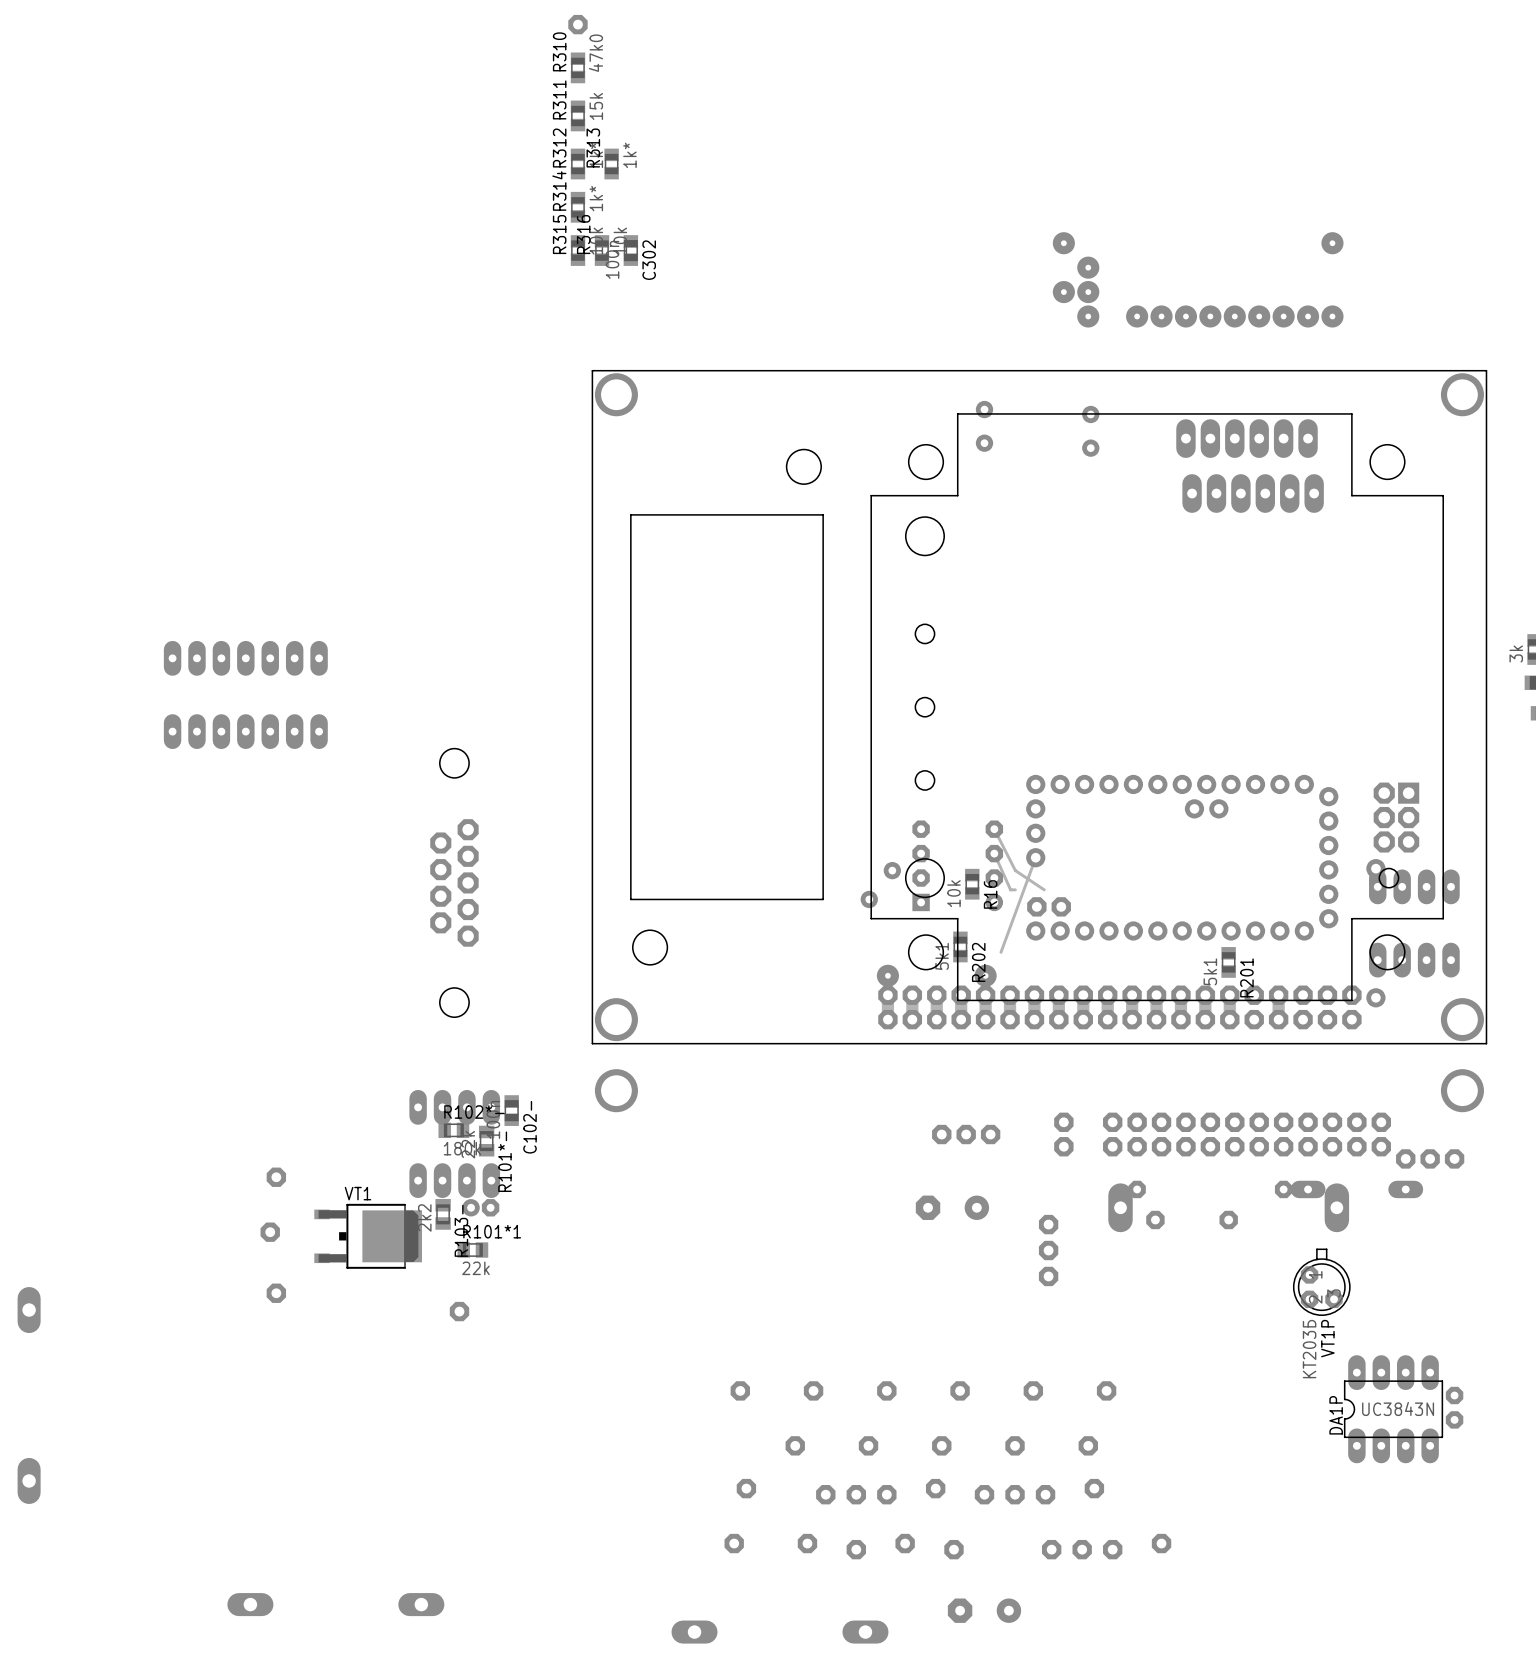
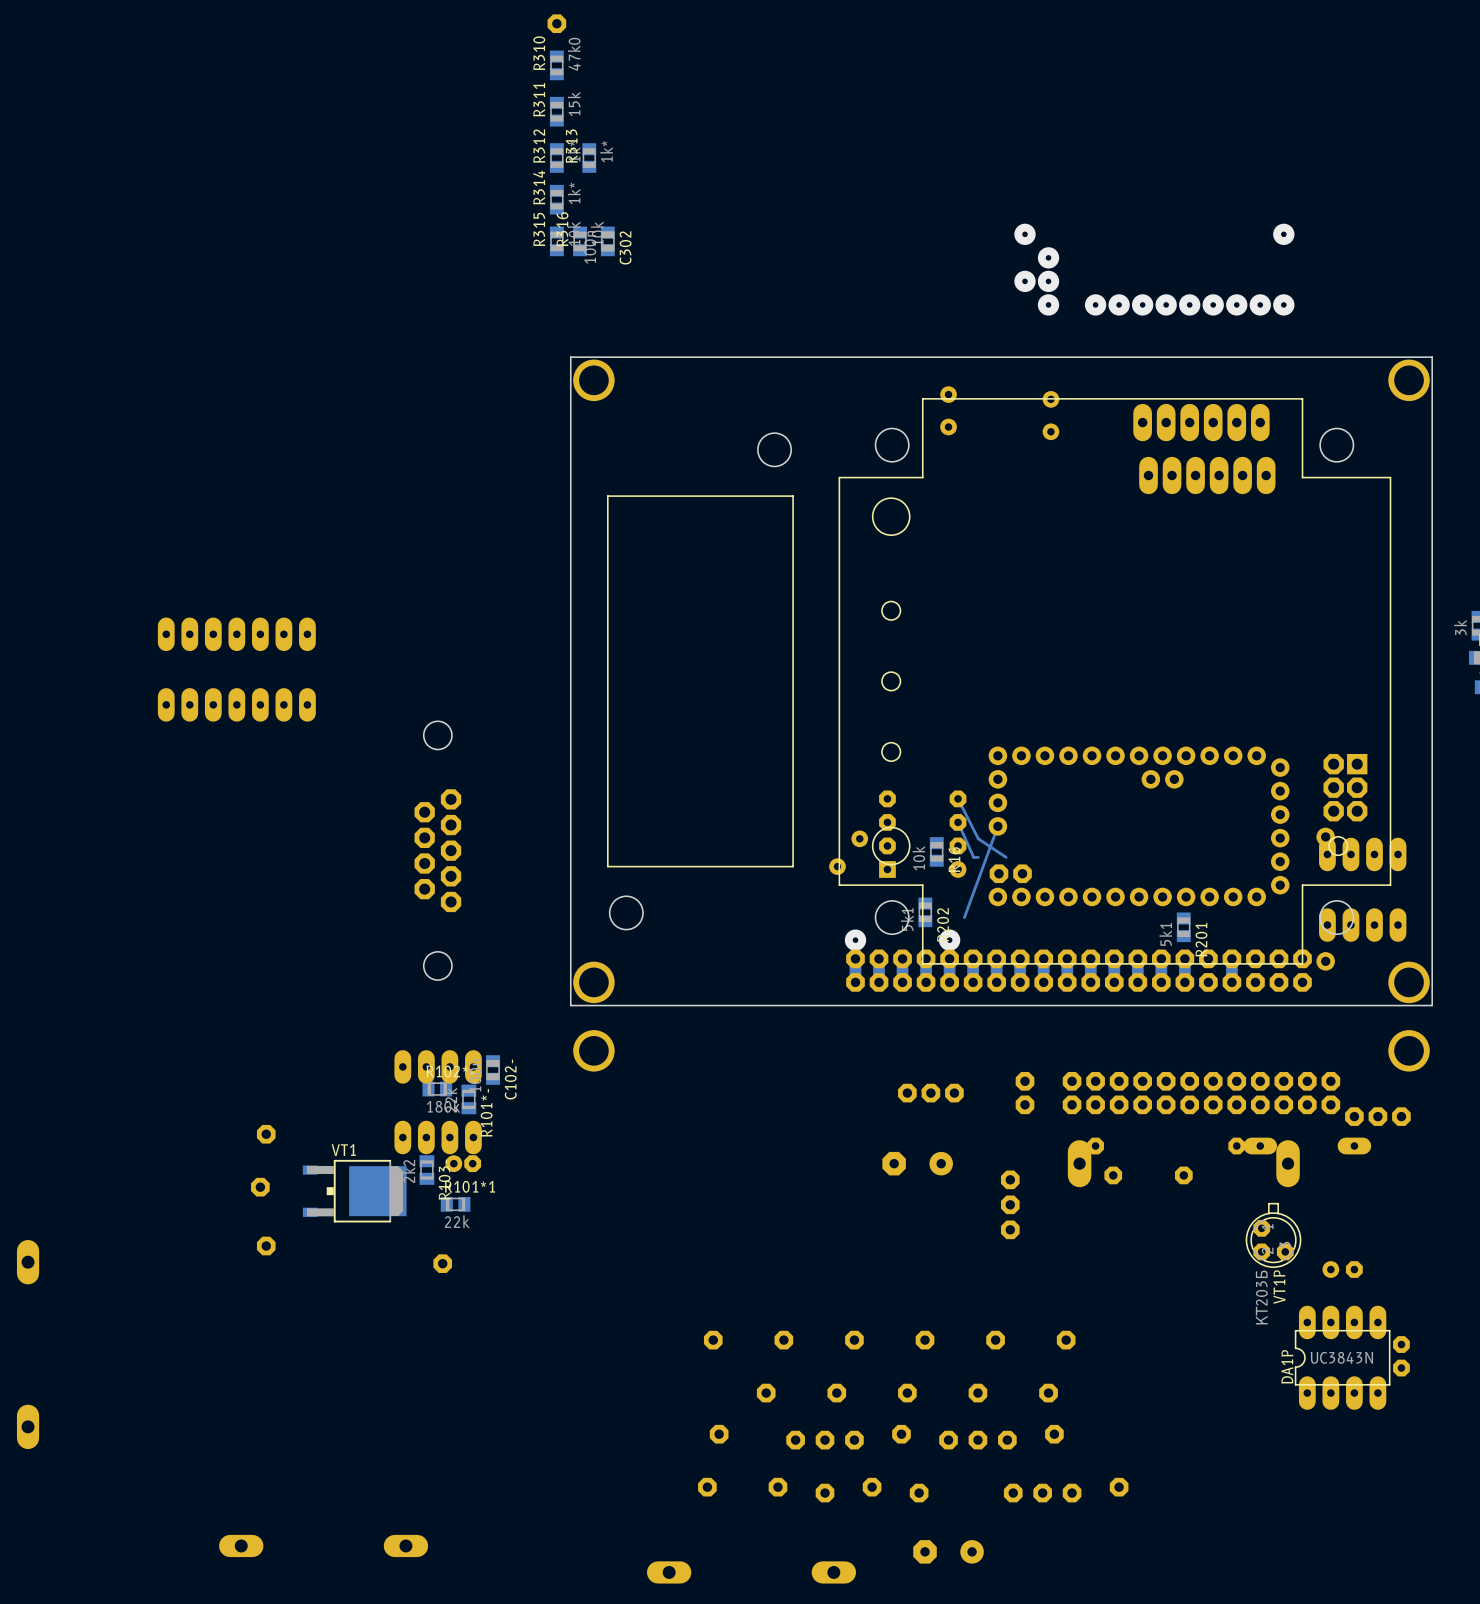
part: none -> (1342, 1269)

